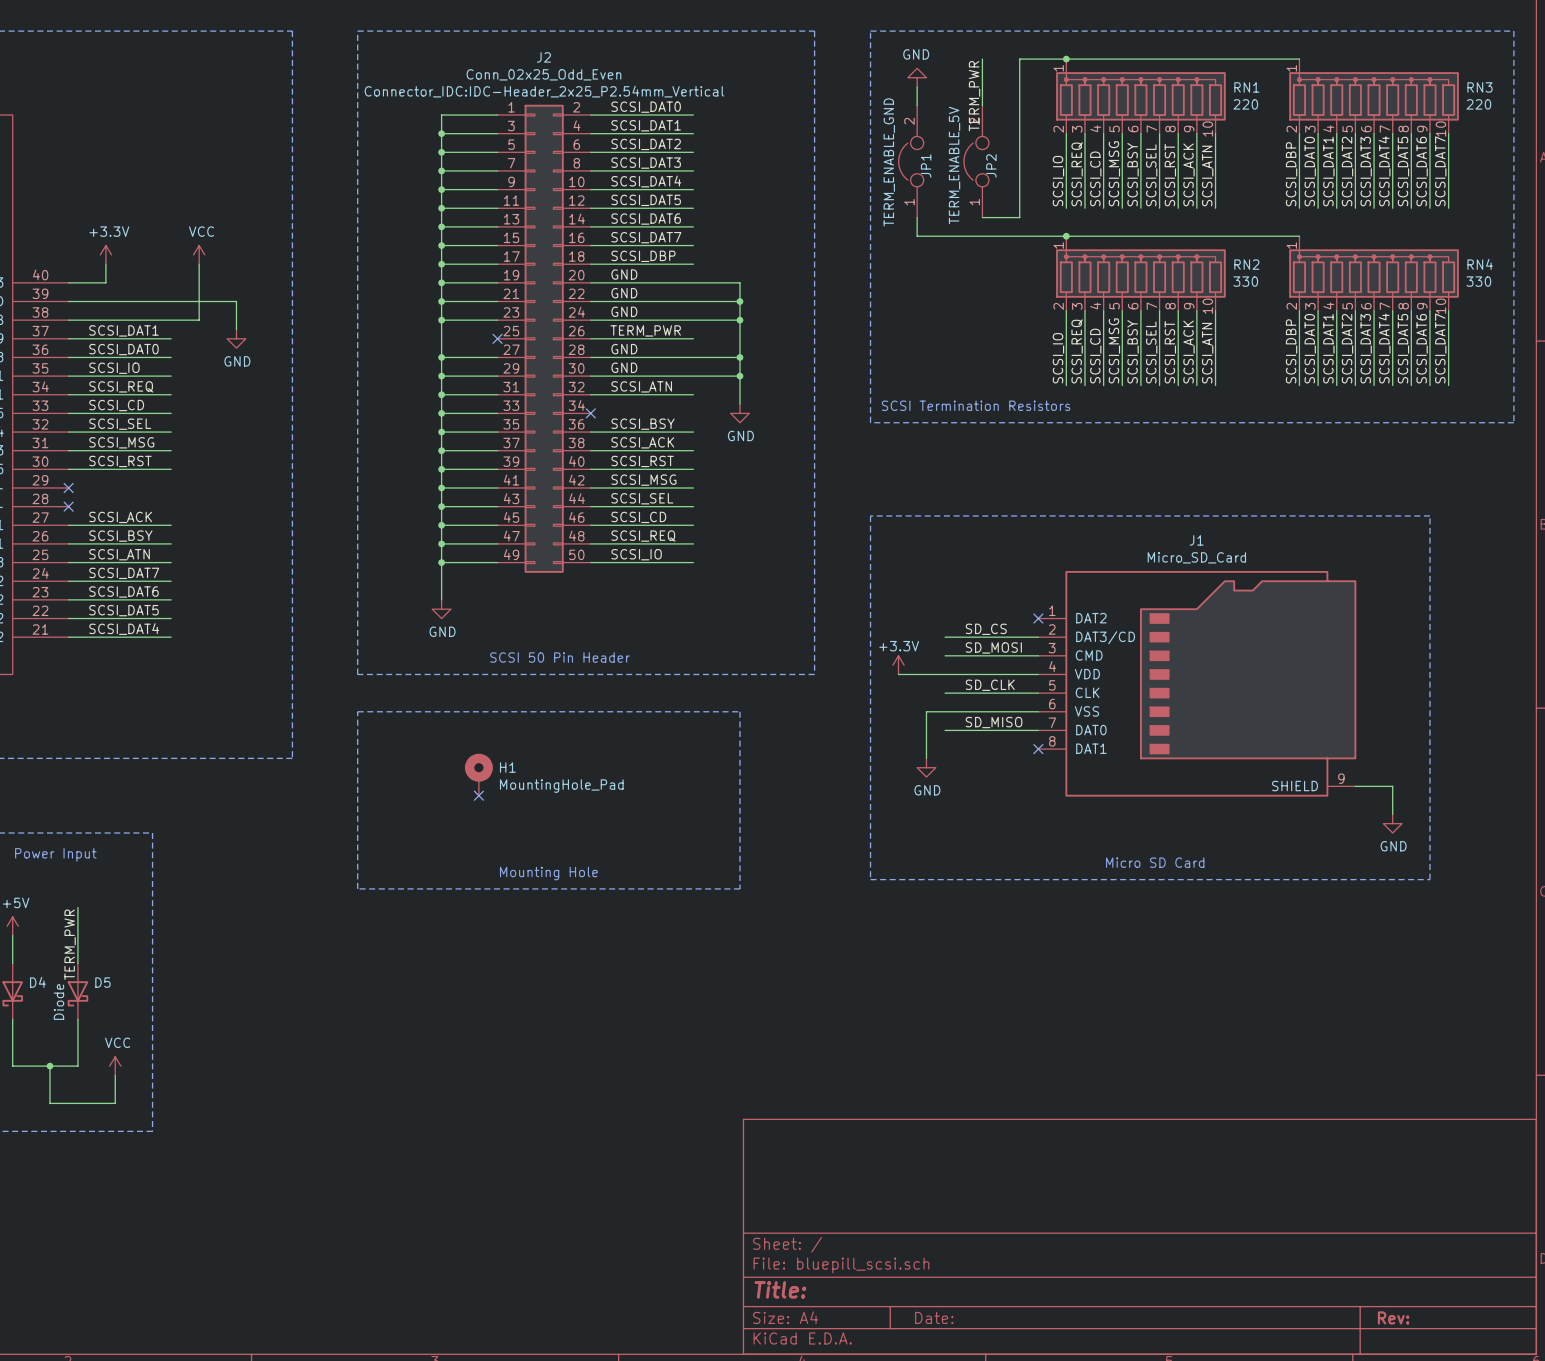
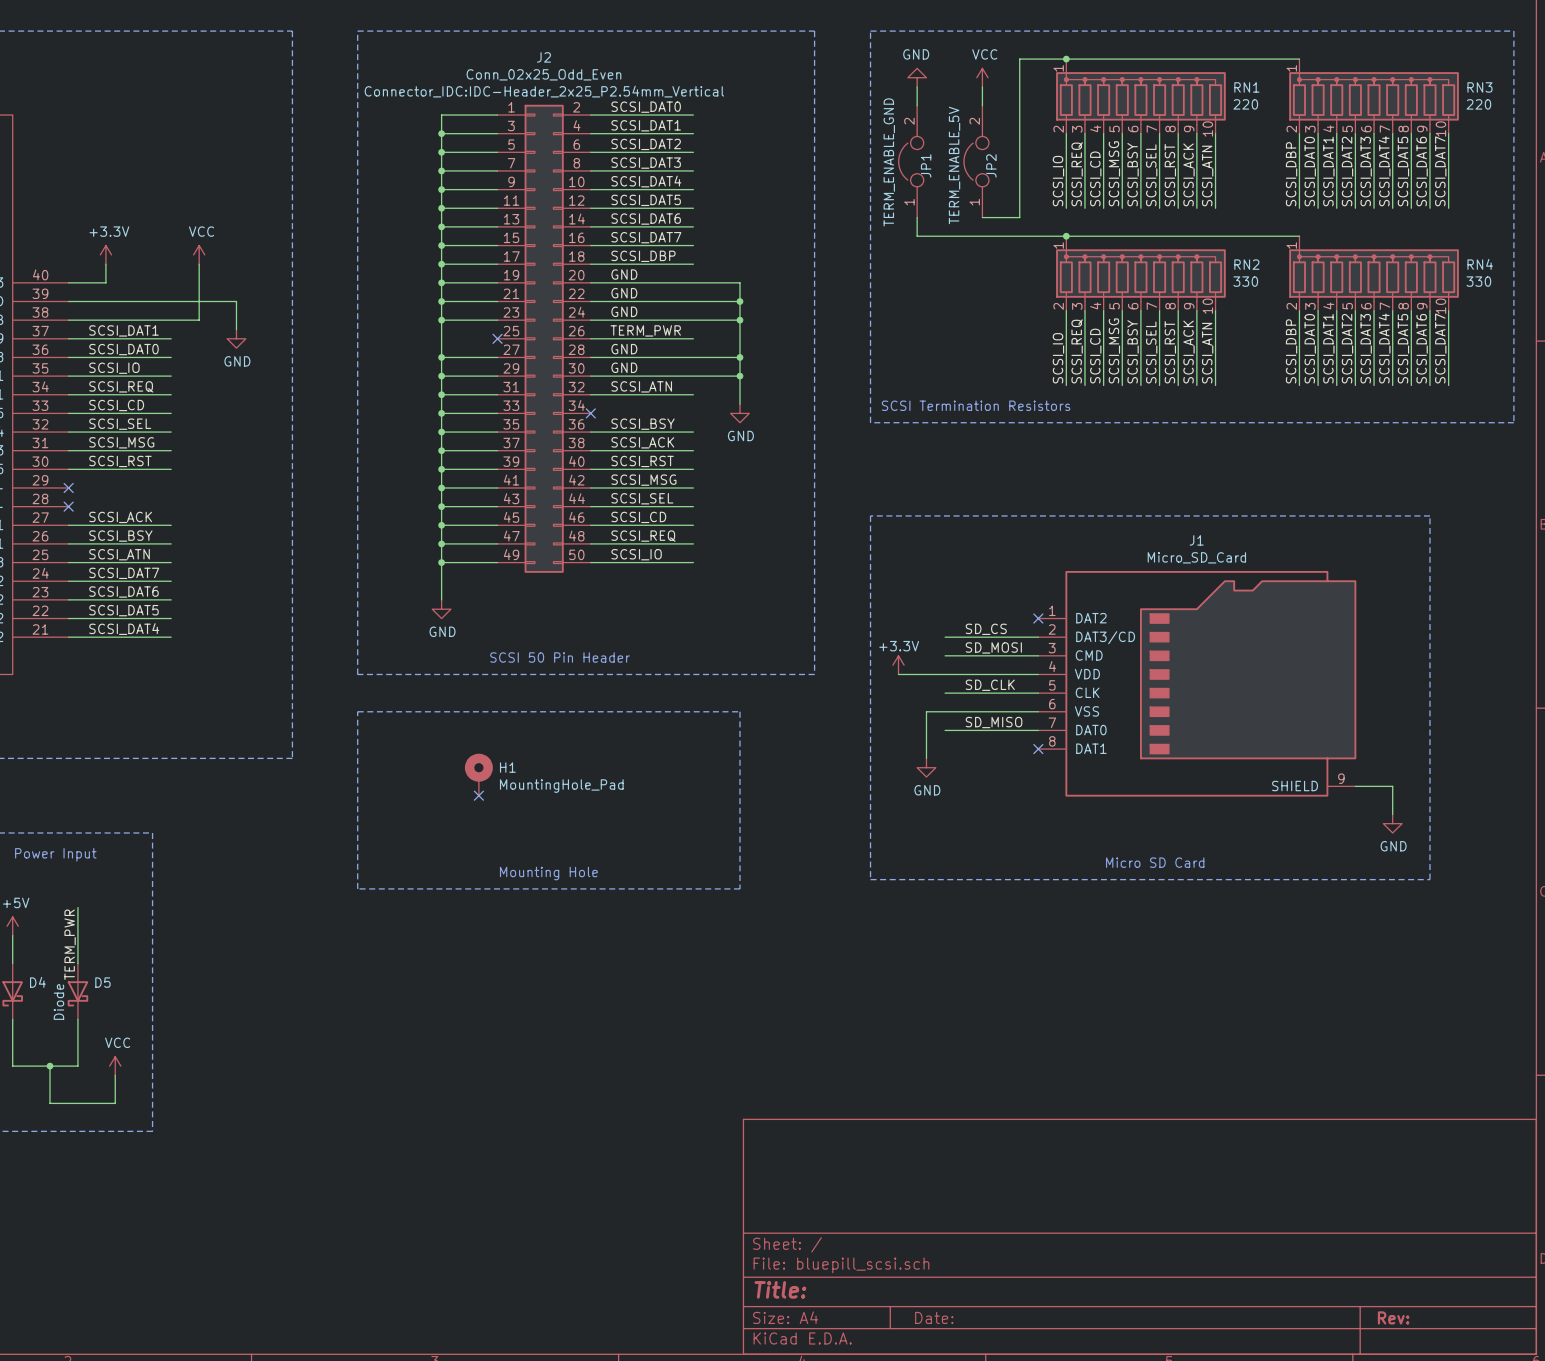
power symbol: none -> VCC (982, 77)
label: TERM_PWR (974, 96) -> none

